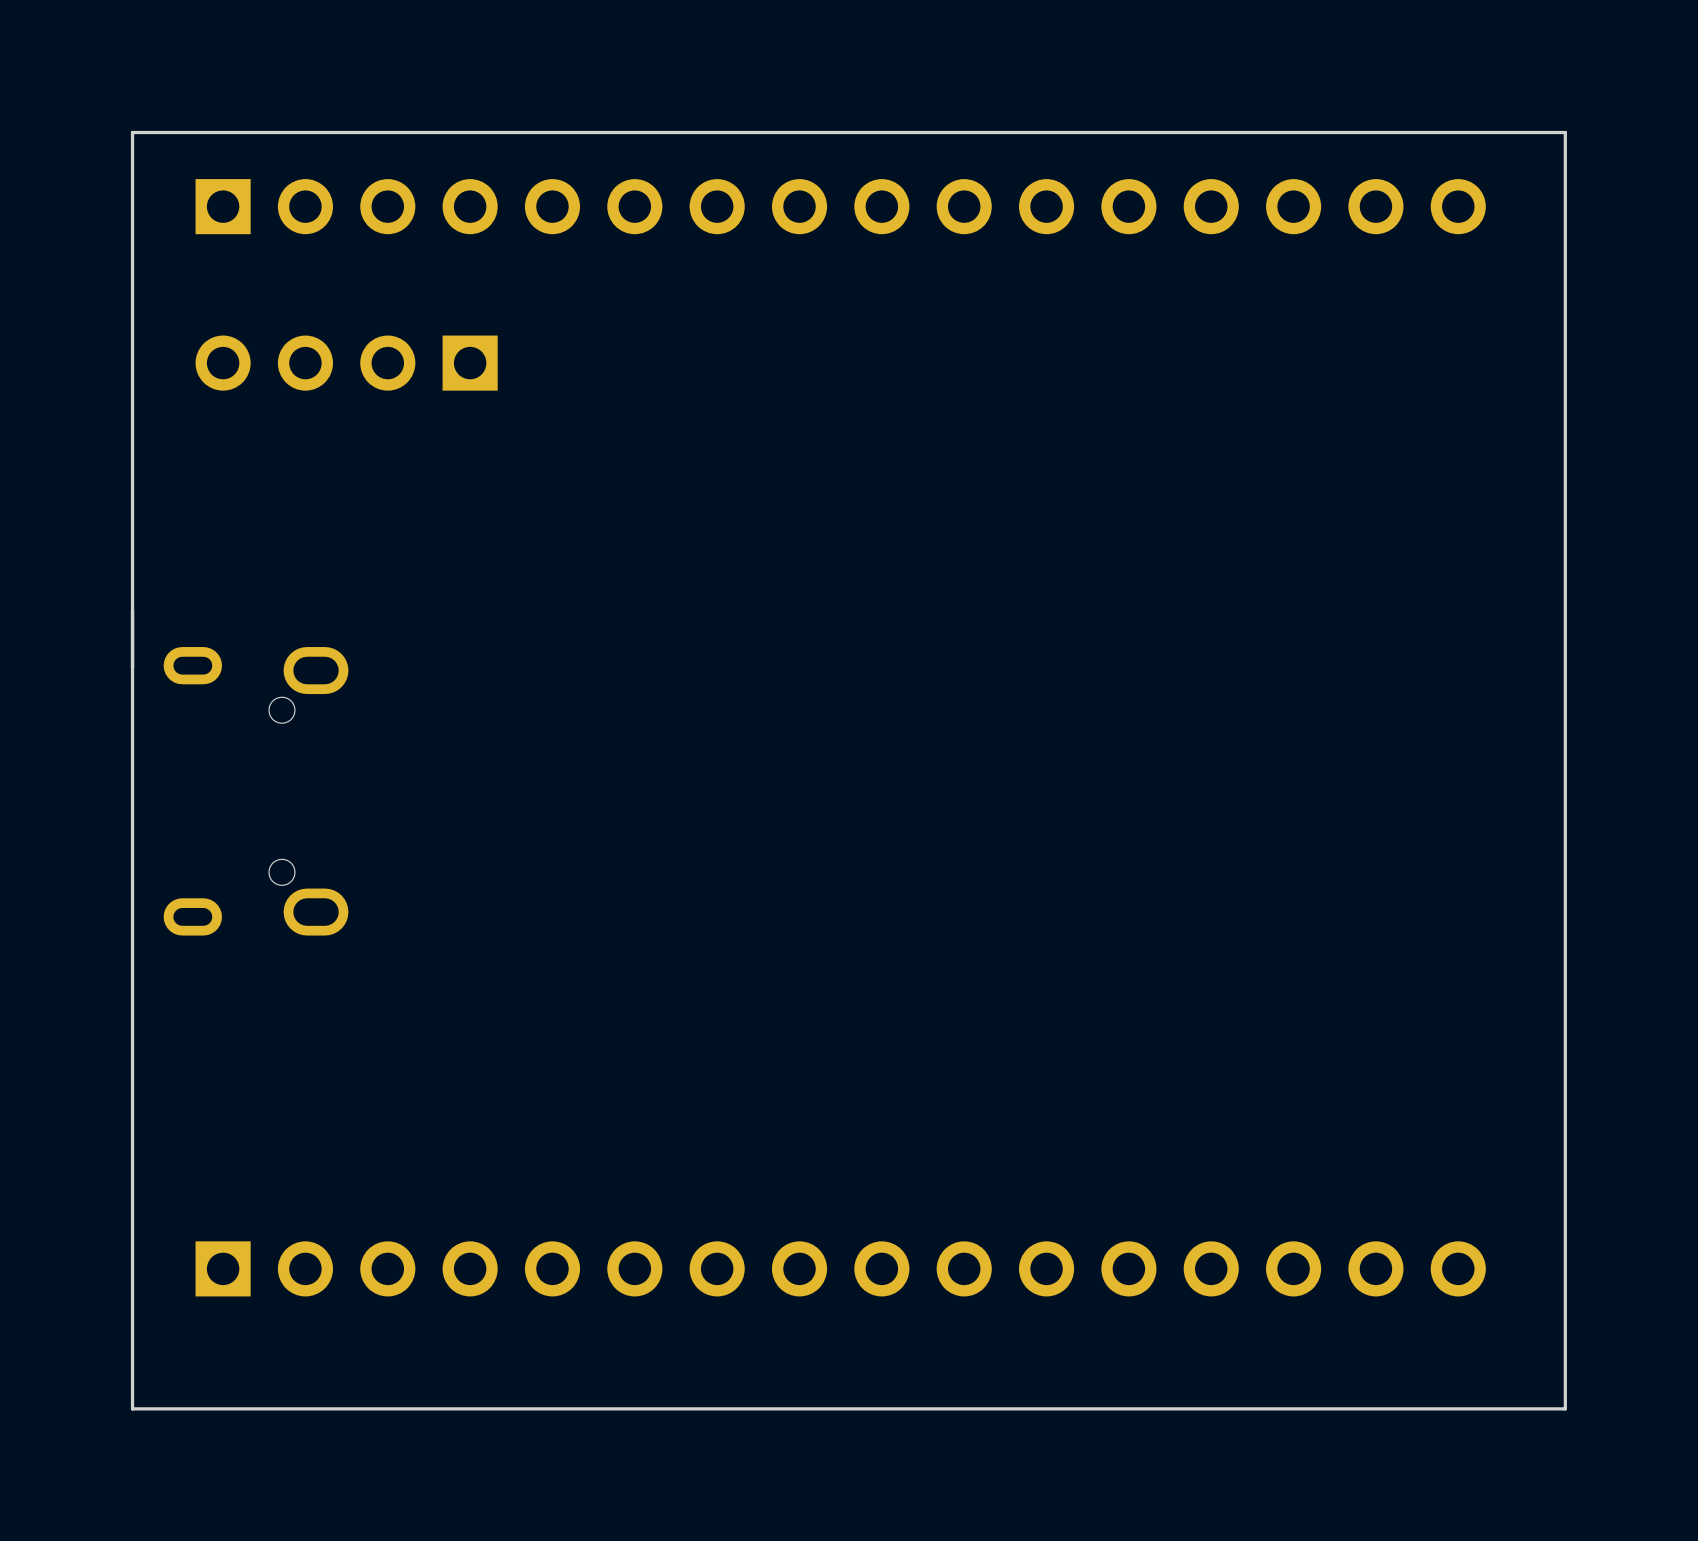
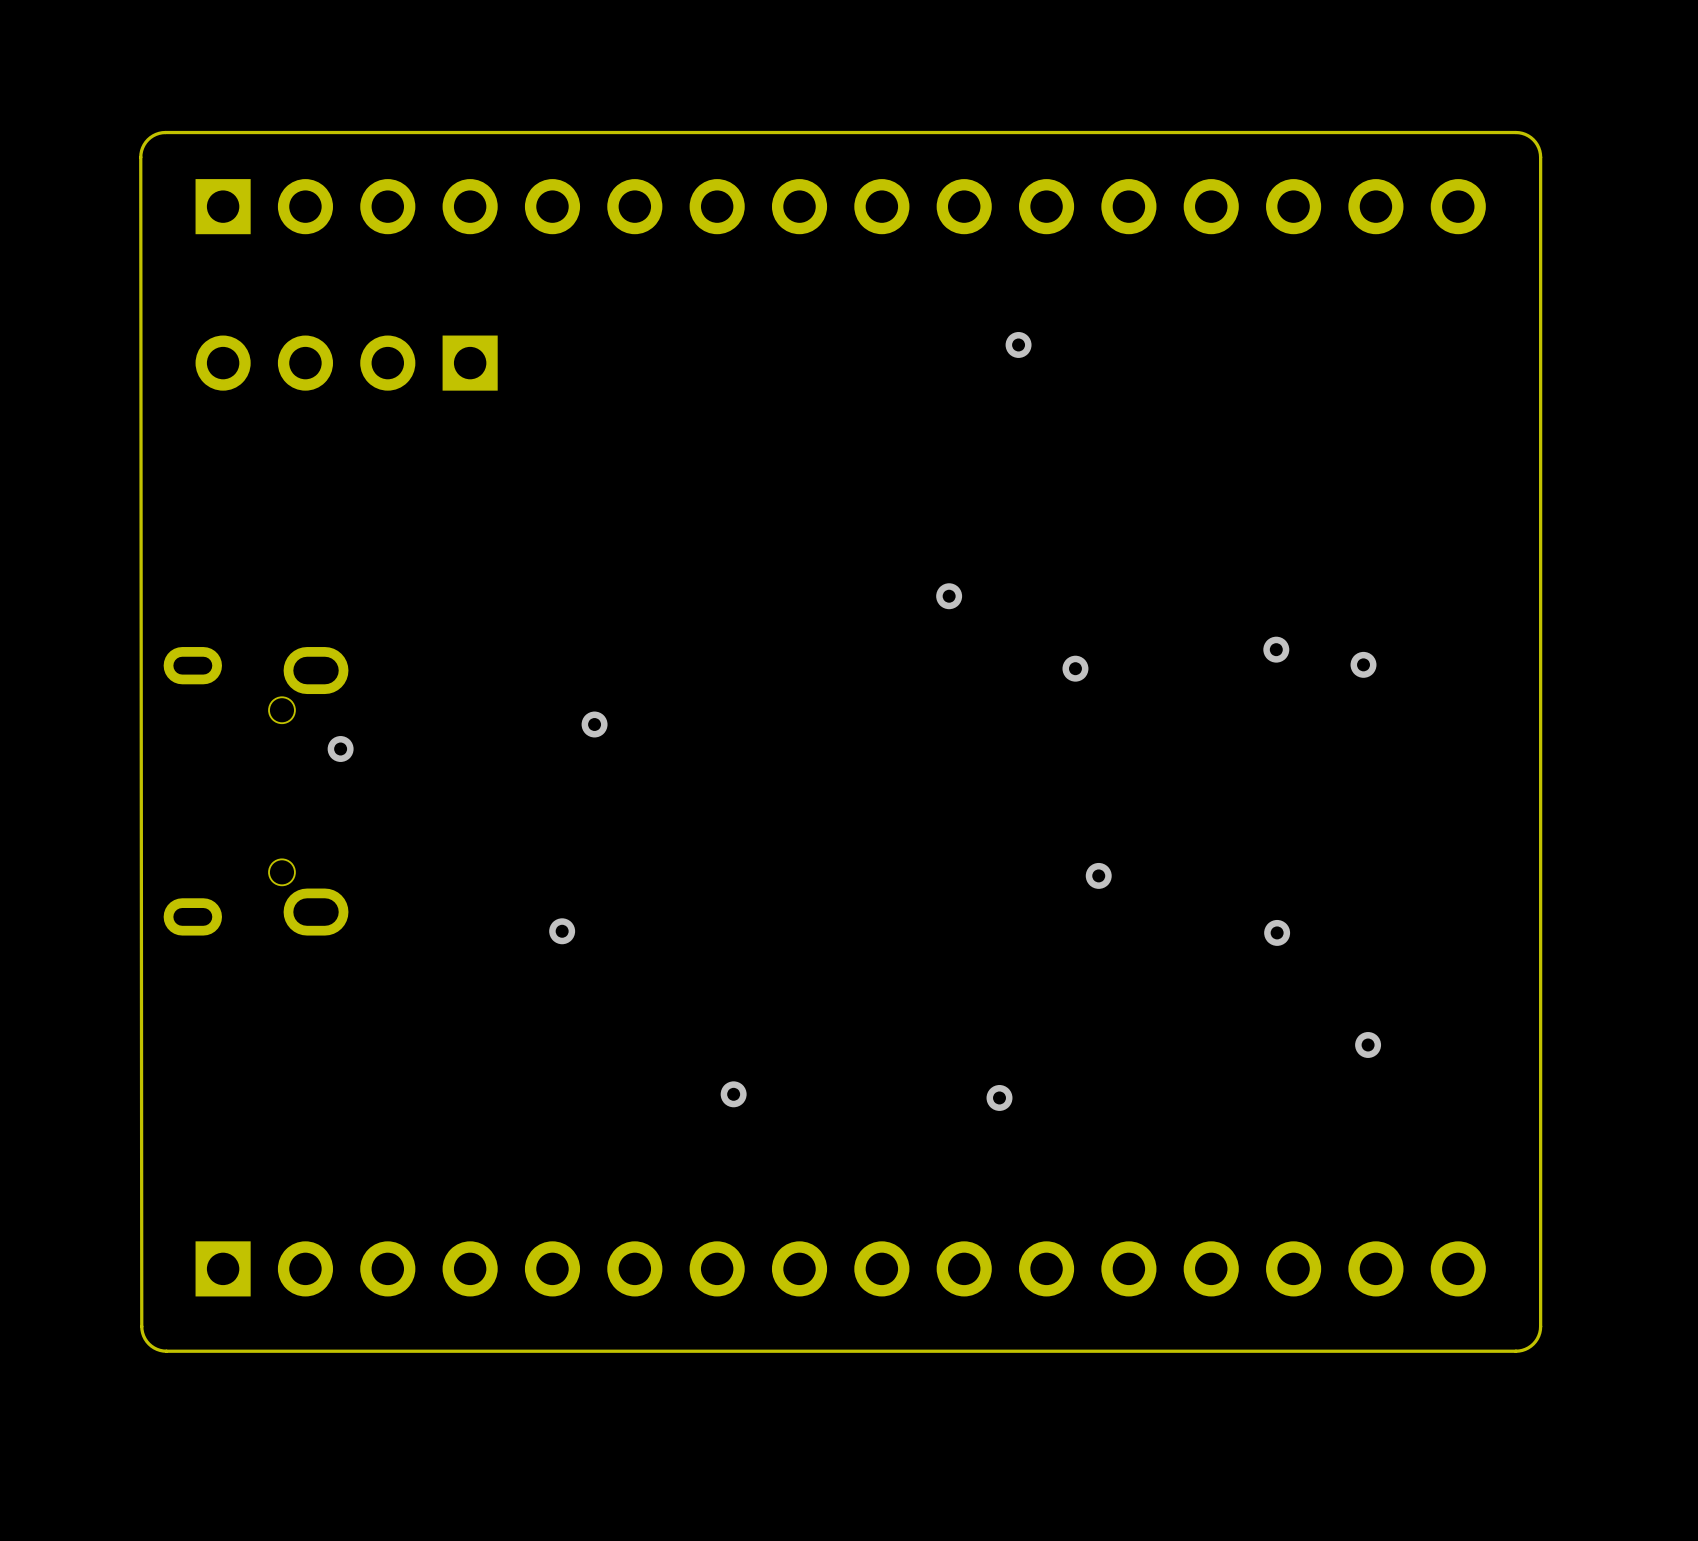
board edge: (1515, 132) (1565, 132) (1565, 1408) (132, 1408) (132, 132) (165, 132) -> (1515, 132) (1525, 134) (1533, 139) (1538, 147) (1540, 157) (1540, 1326) (1538, 1335) (1533, 1344) (1525, 1349) (1515, 1351) (166, 1351) (157, 1349) (148, 1344) (143, 1335) (141, 1326) (140, 157) (142, 147) (147, 139) (156, 134) (165, 132)
via: none -> (1018, 344)
via: none -> (949, 596)
via: none -> (1276, 649)
via: none -> (1363, 664)
via: none -> (1075, 668)
via: none -> (594, 724)
via: none -> (340, 749)
via: none -> (1098, 875)
via: none -> (562, 931)
via: none -> (1277, 932)
via: none -> (1368, 1044)
via: none -> (733, 1094)
via: none -> (999, 1097)

